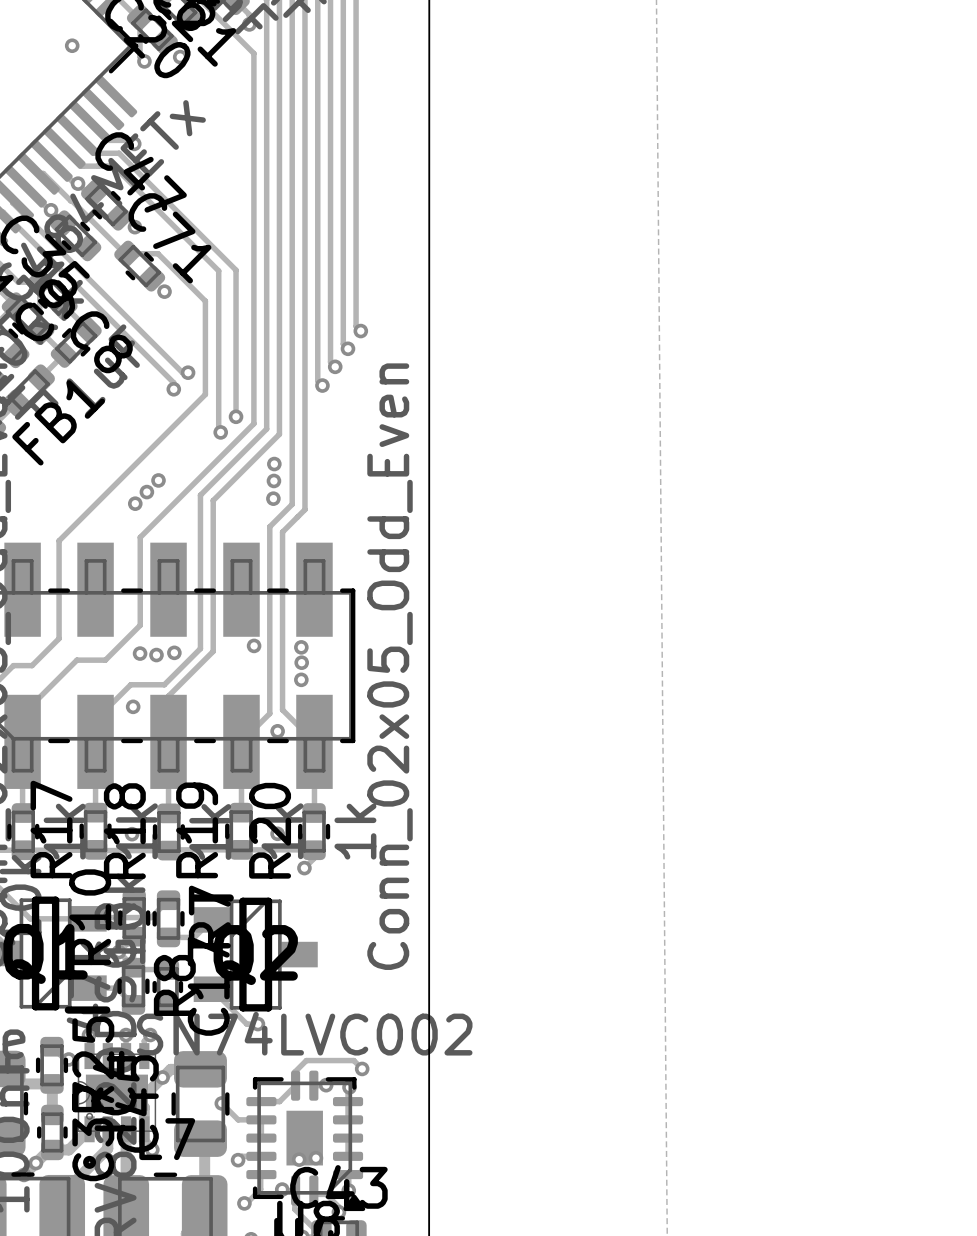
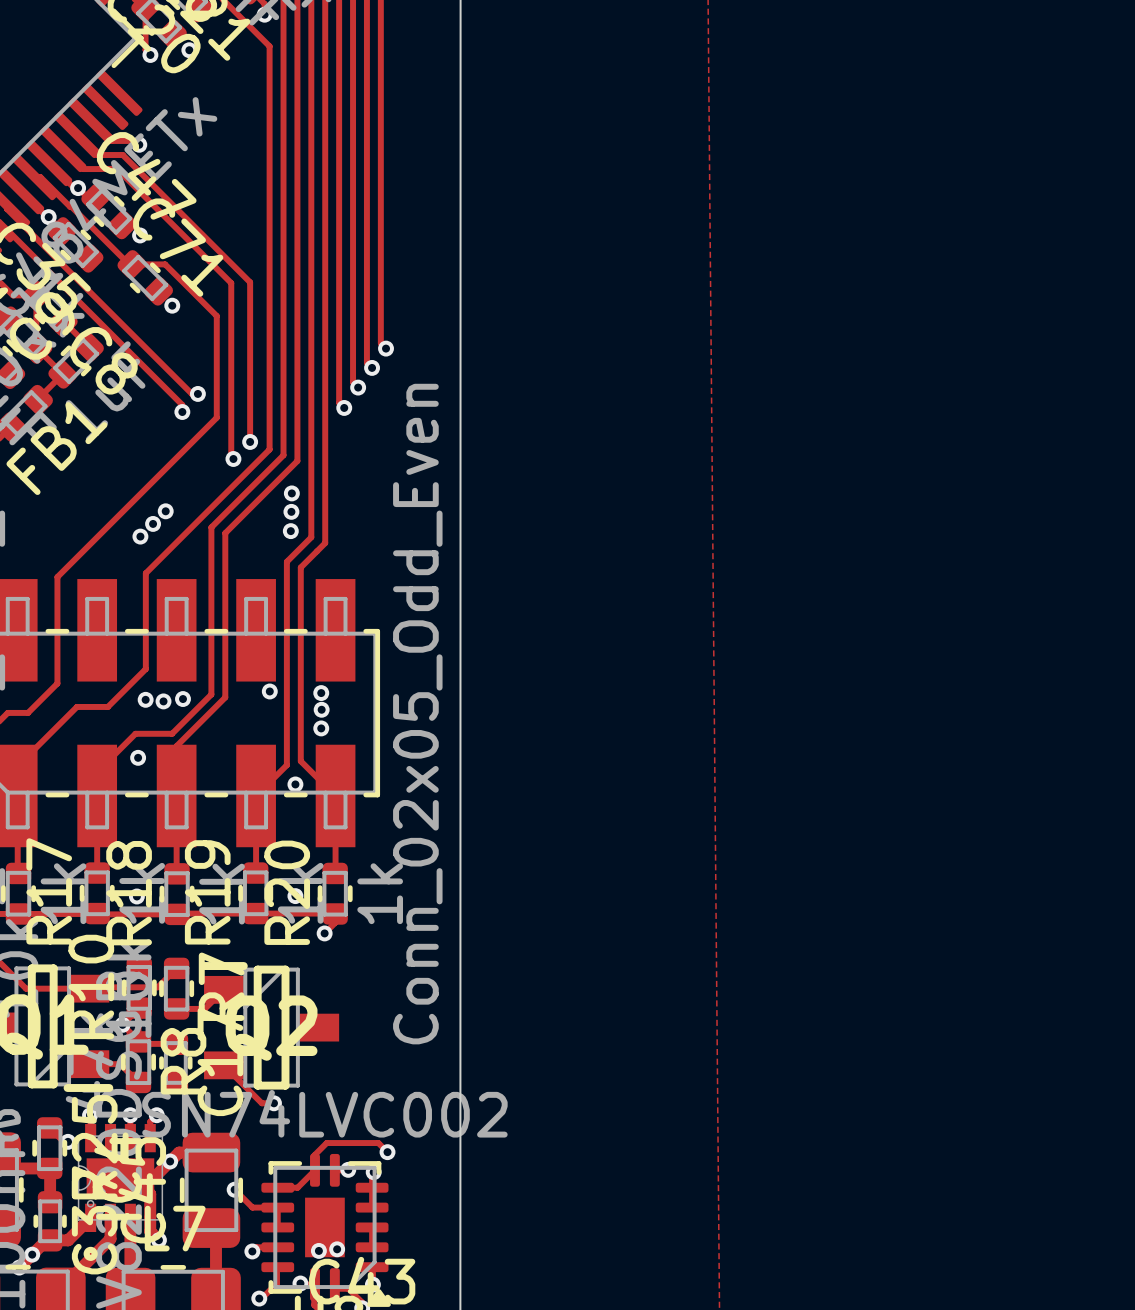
via: (72, 45) -> none

